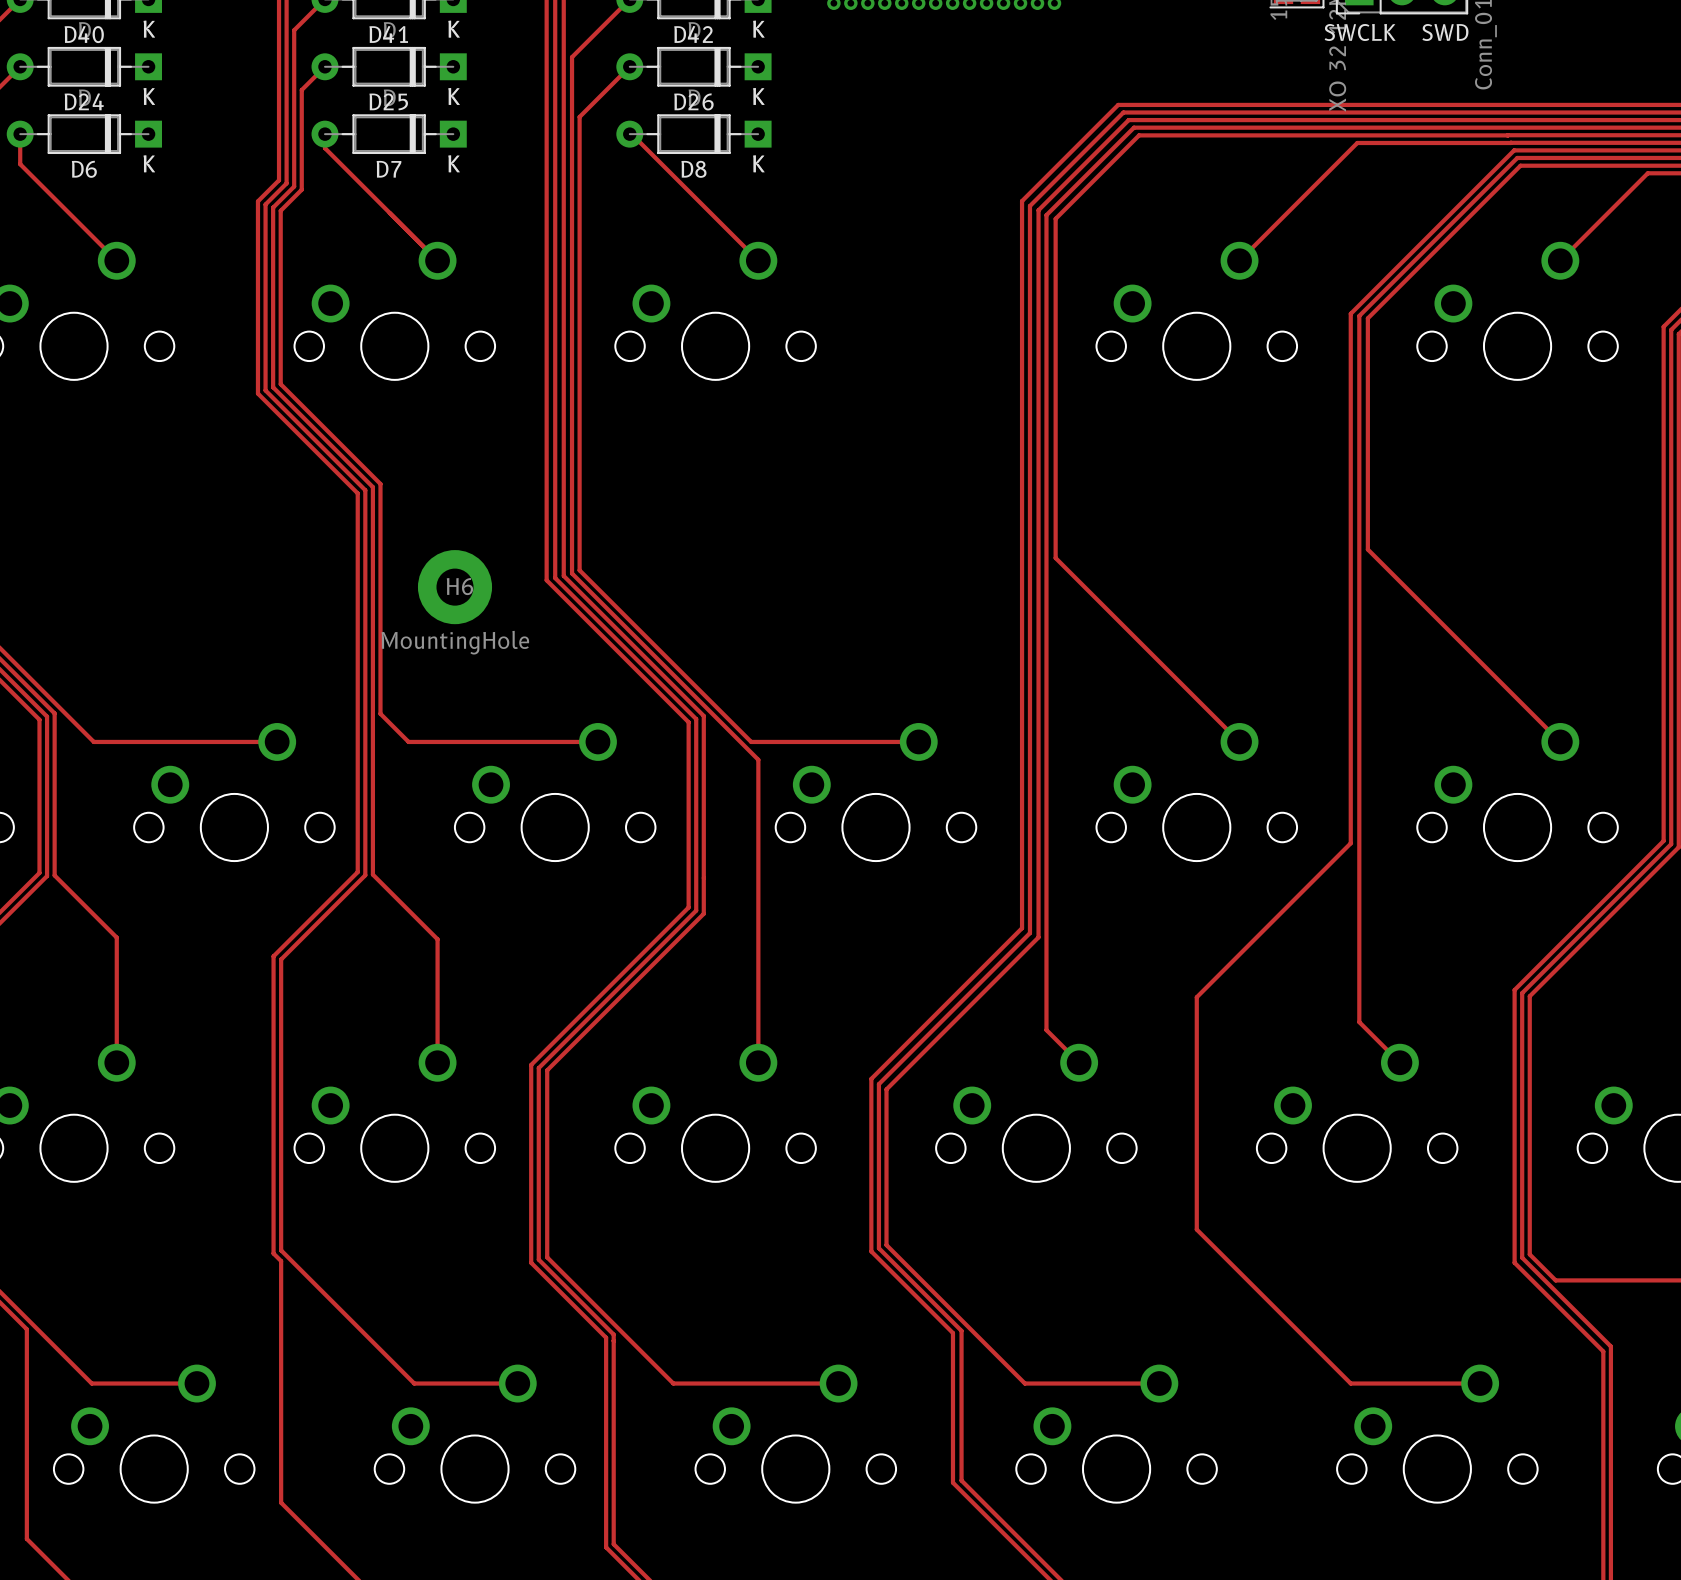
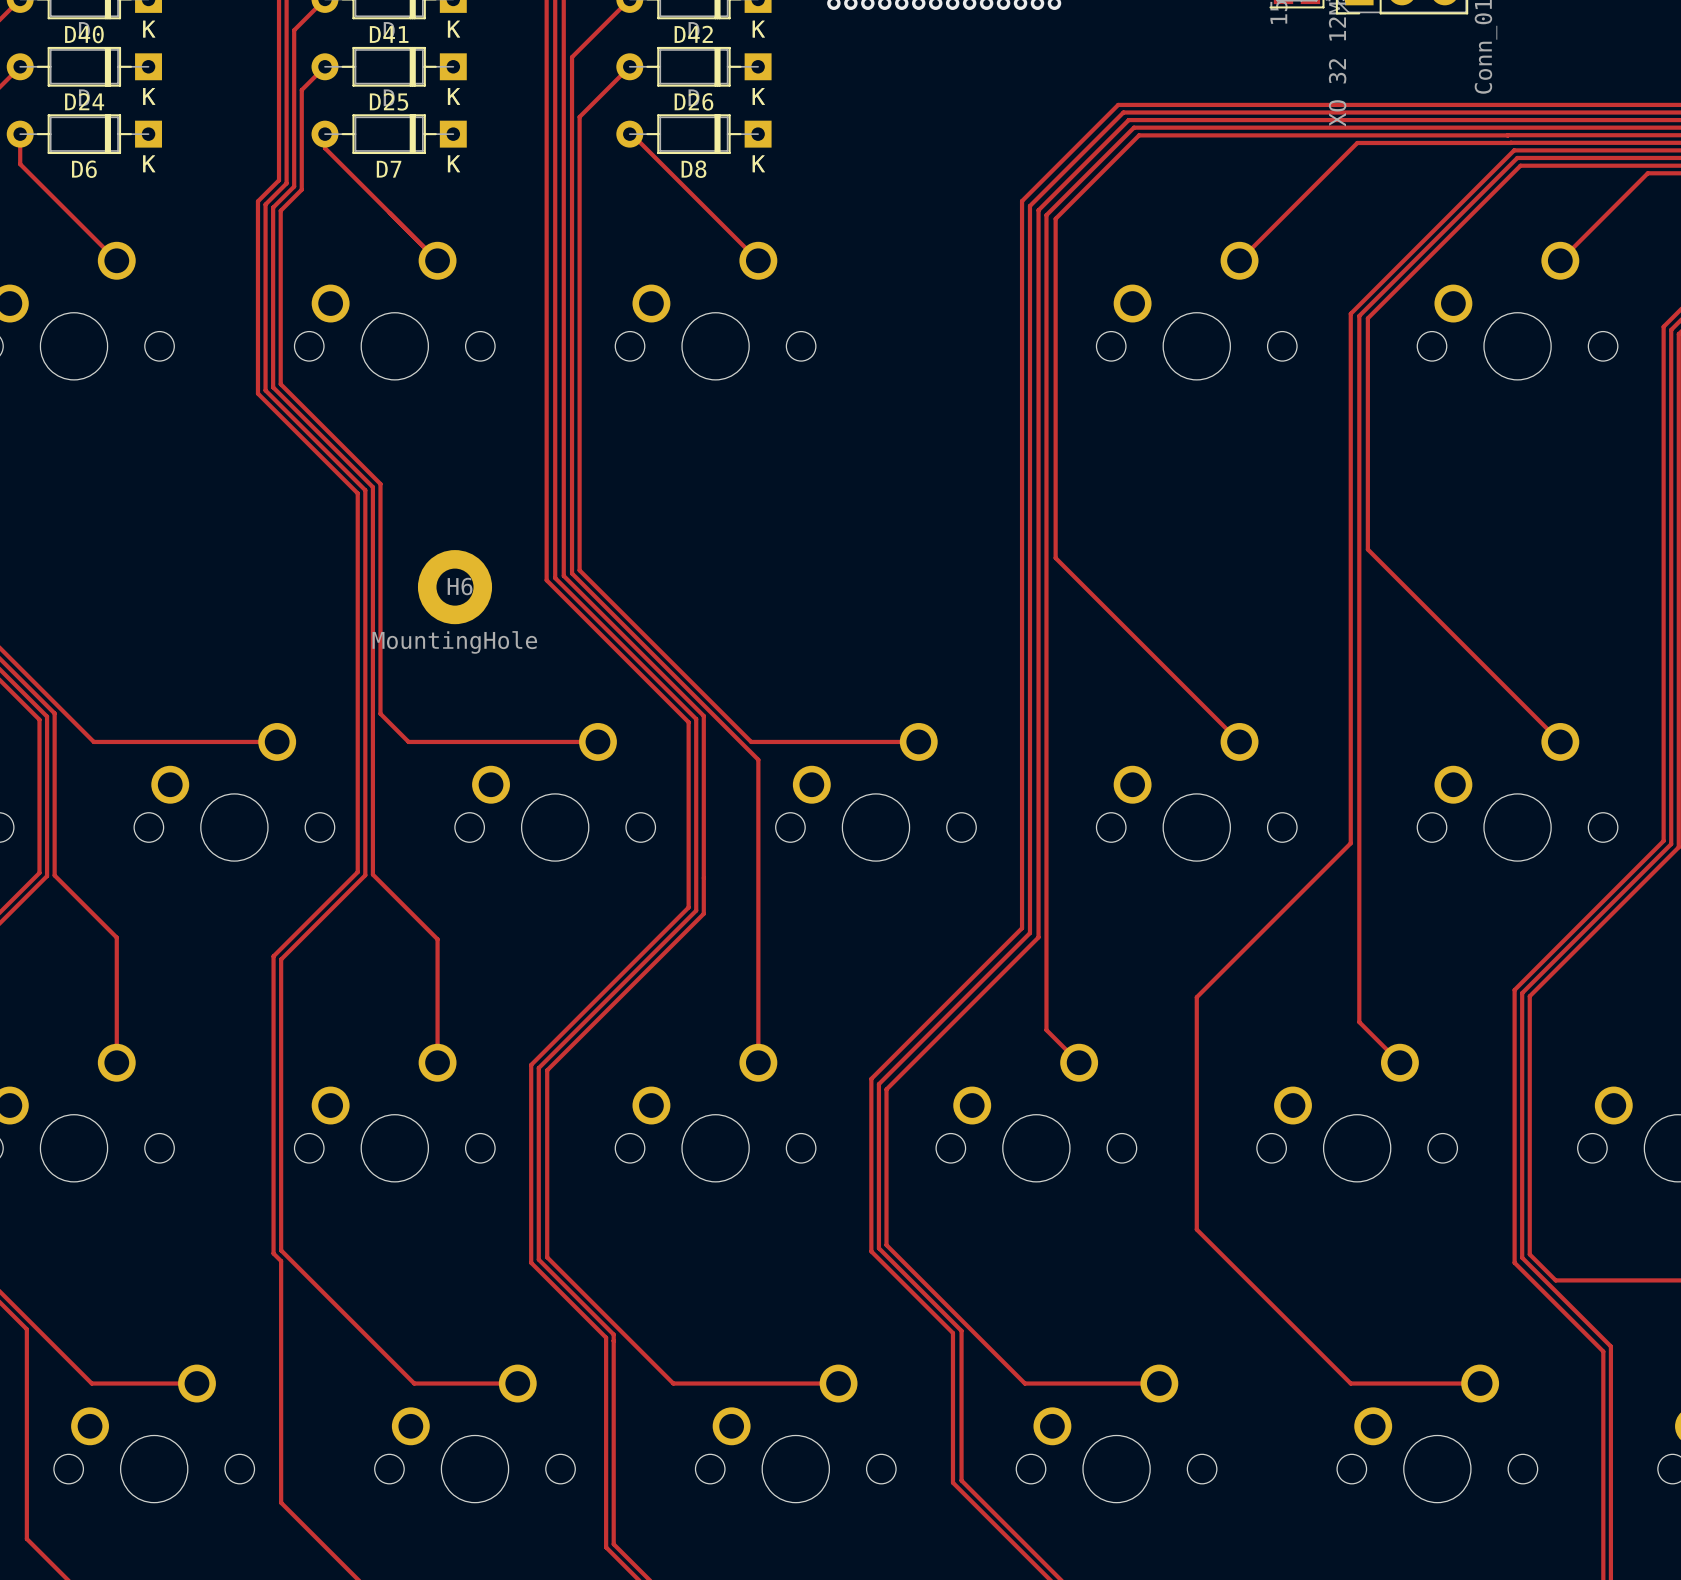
text: SWCLK (1360, 32) -> none
text: SWD (1445, 32) -> none

